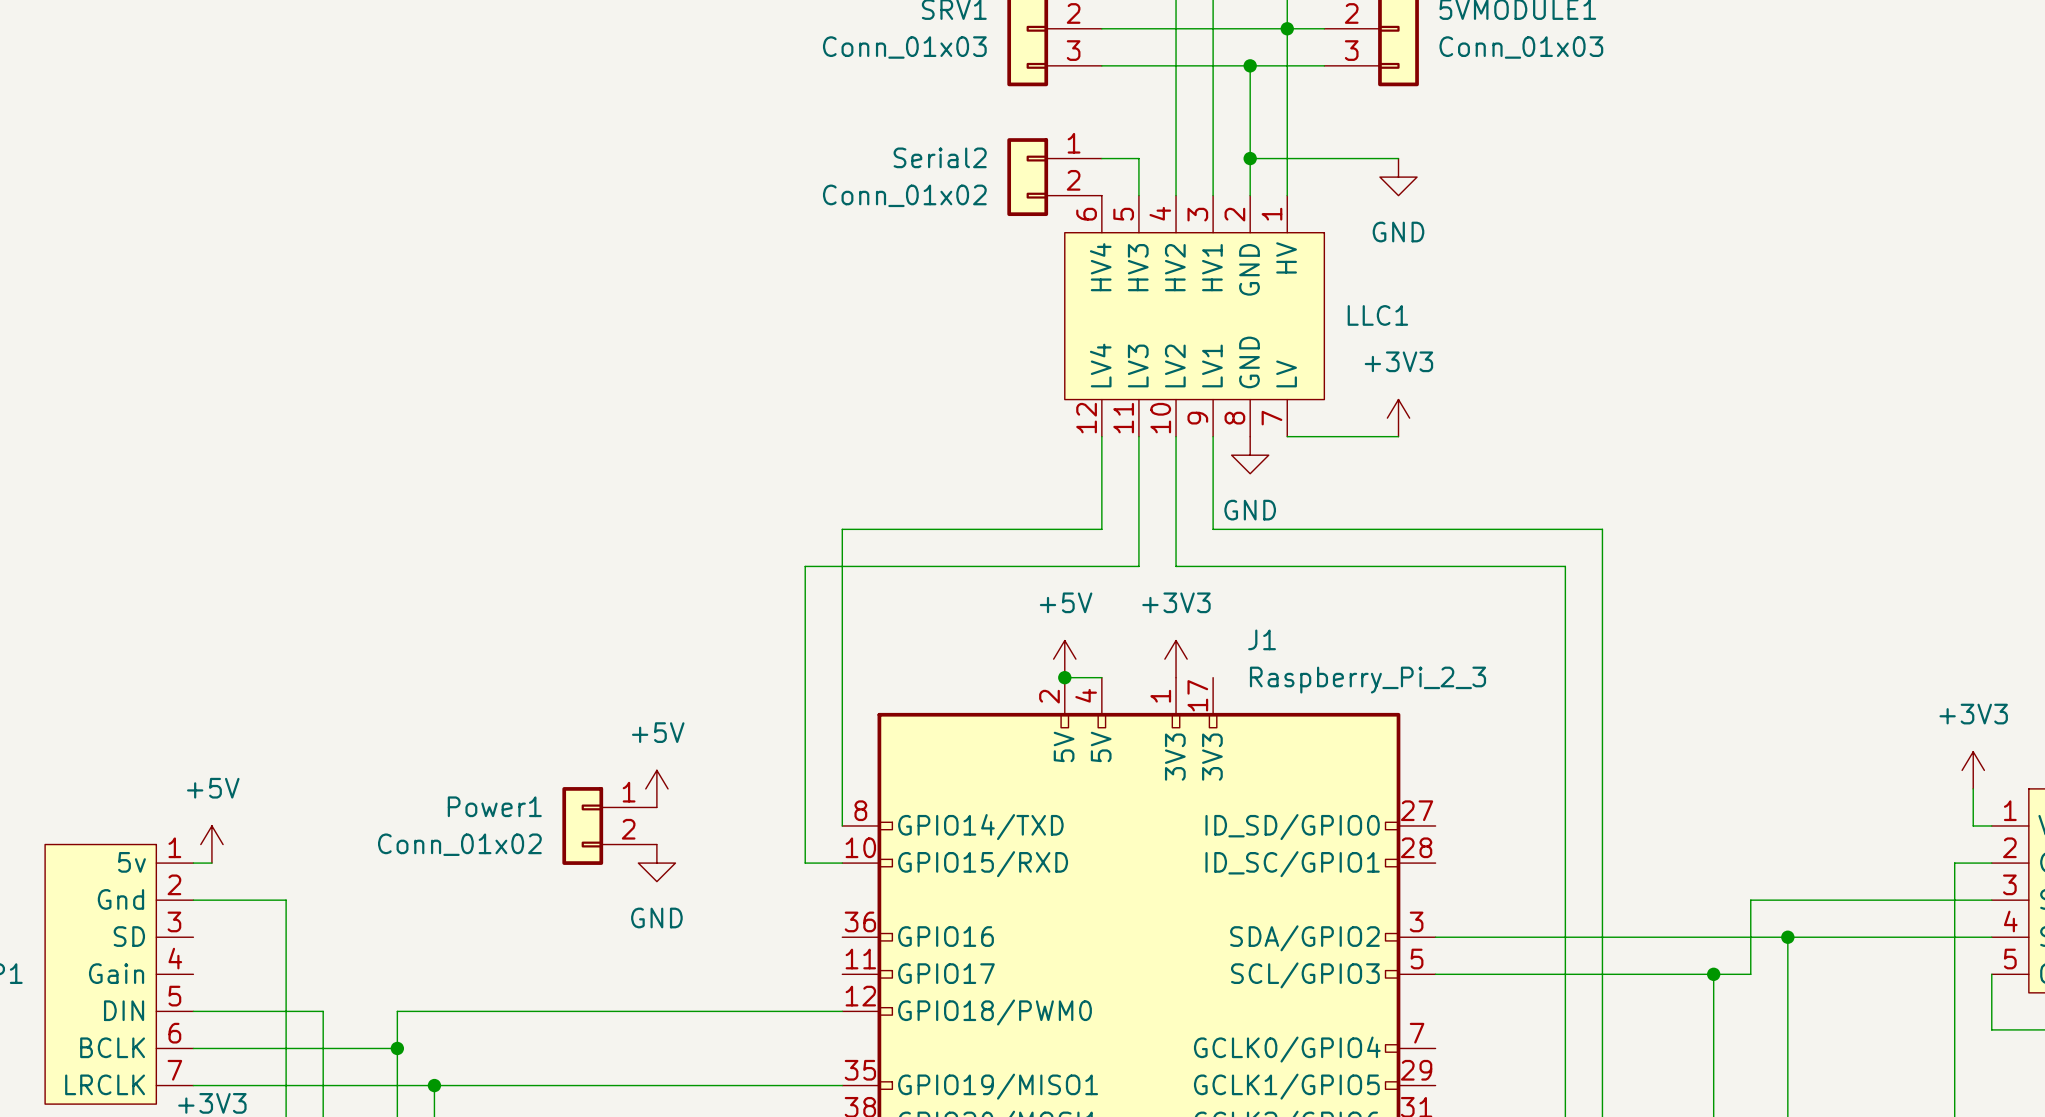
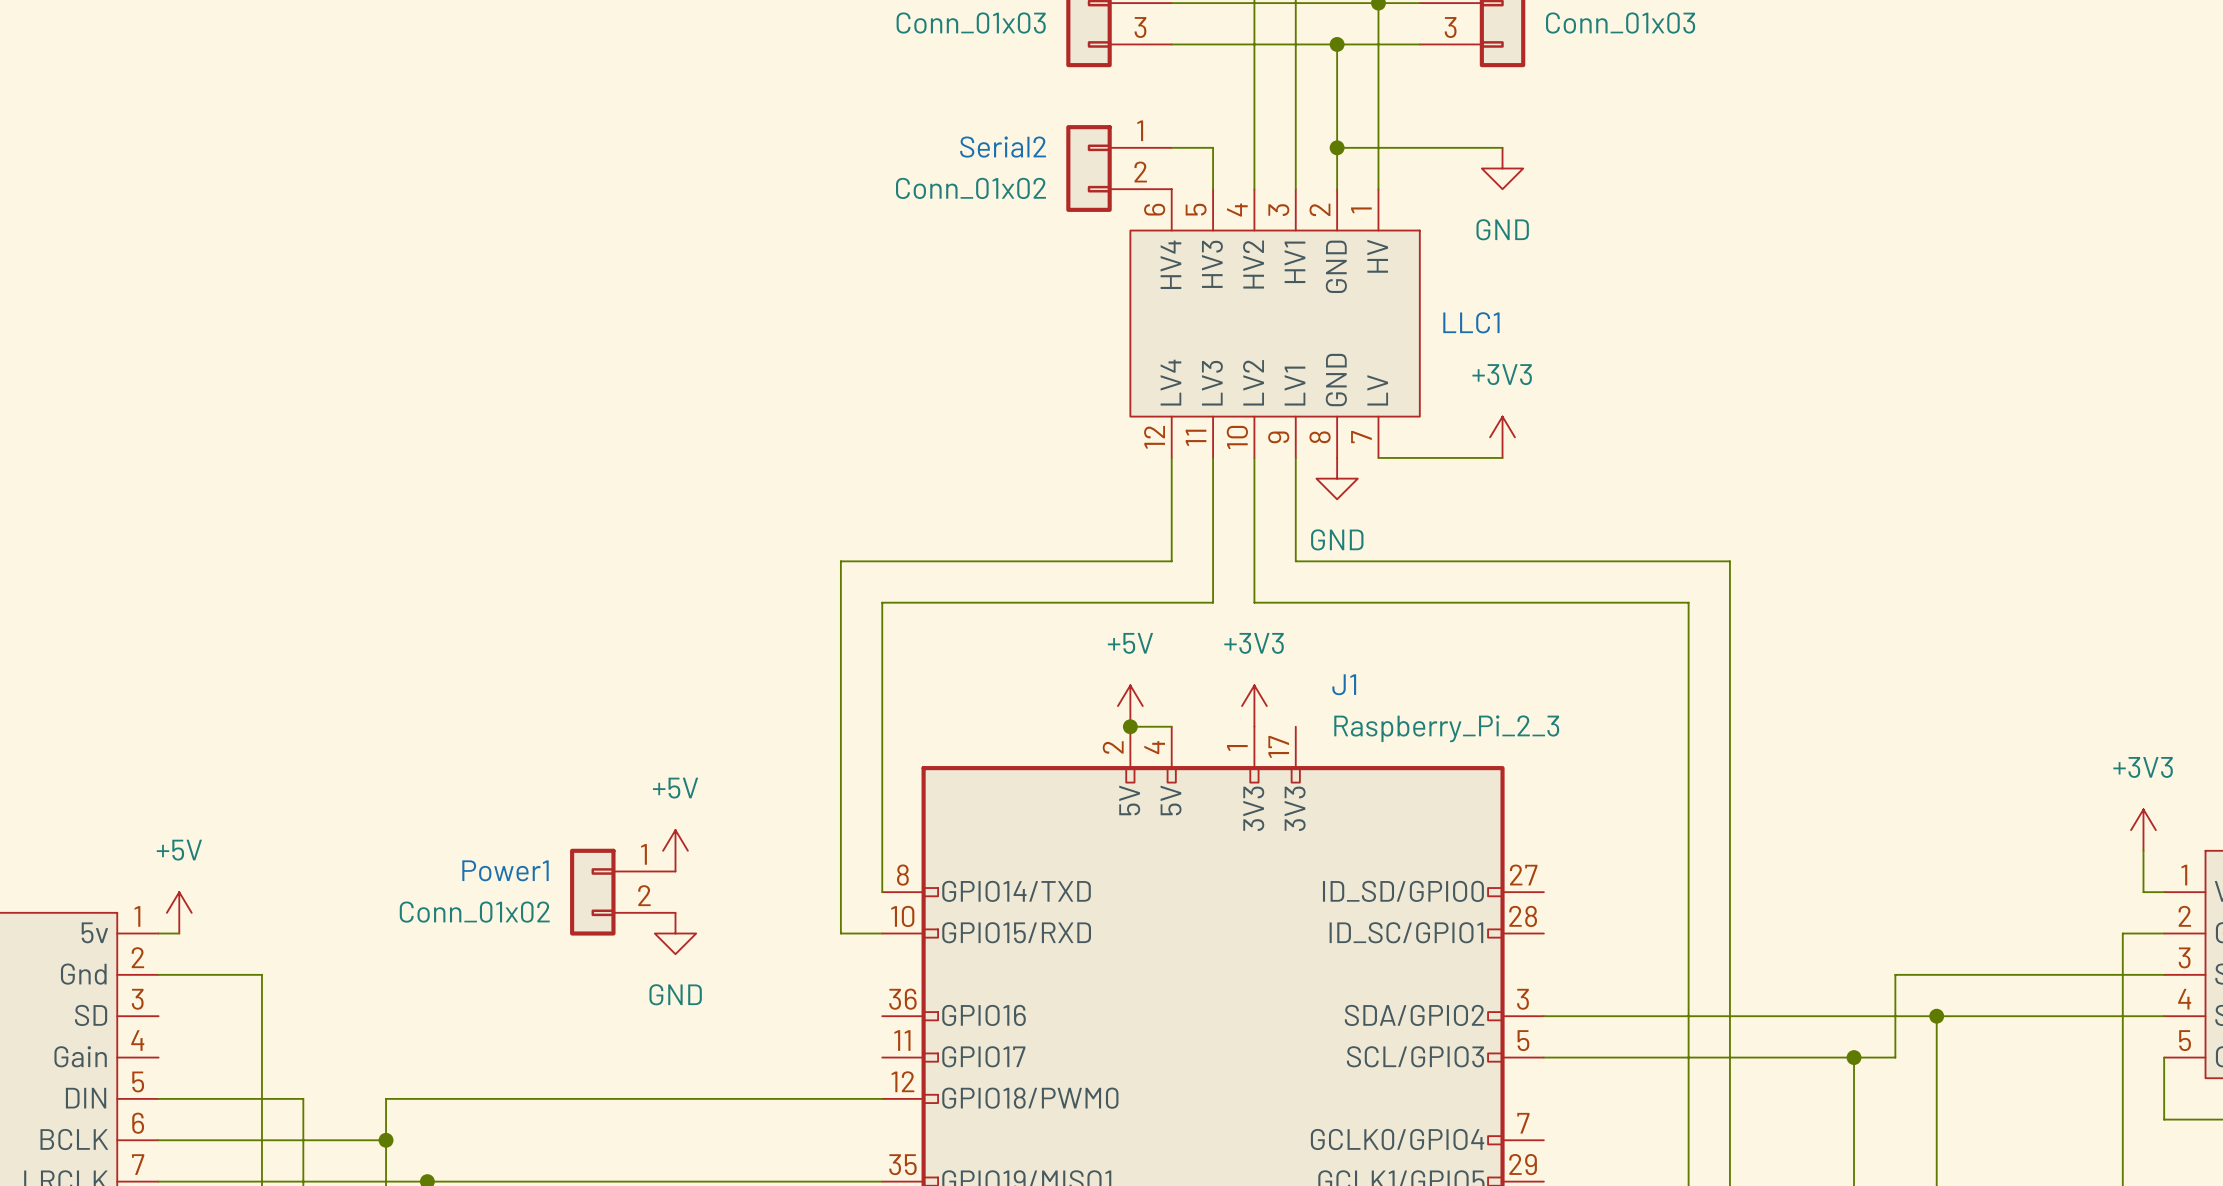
wire: (842, 529) (842, 566) (805, 566) -> (882, 561) (840, 561) (840, 602)

